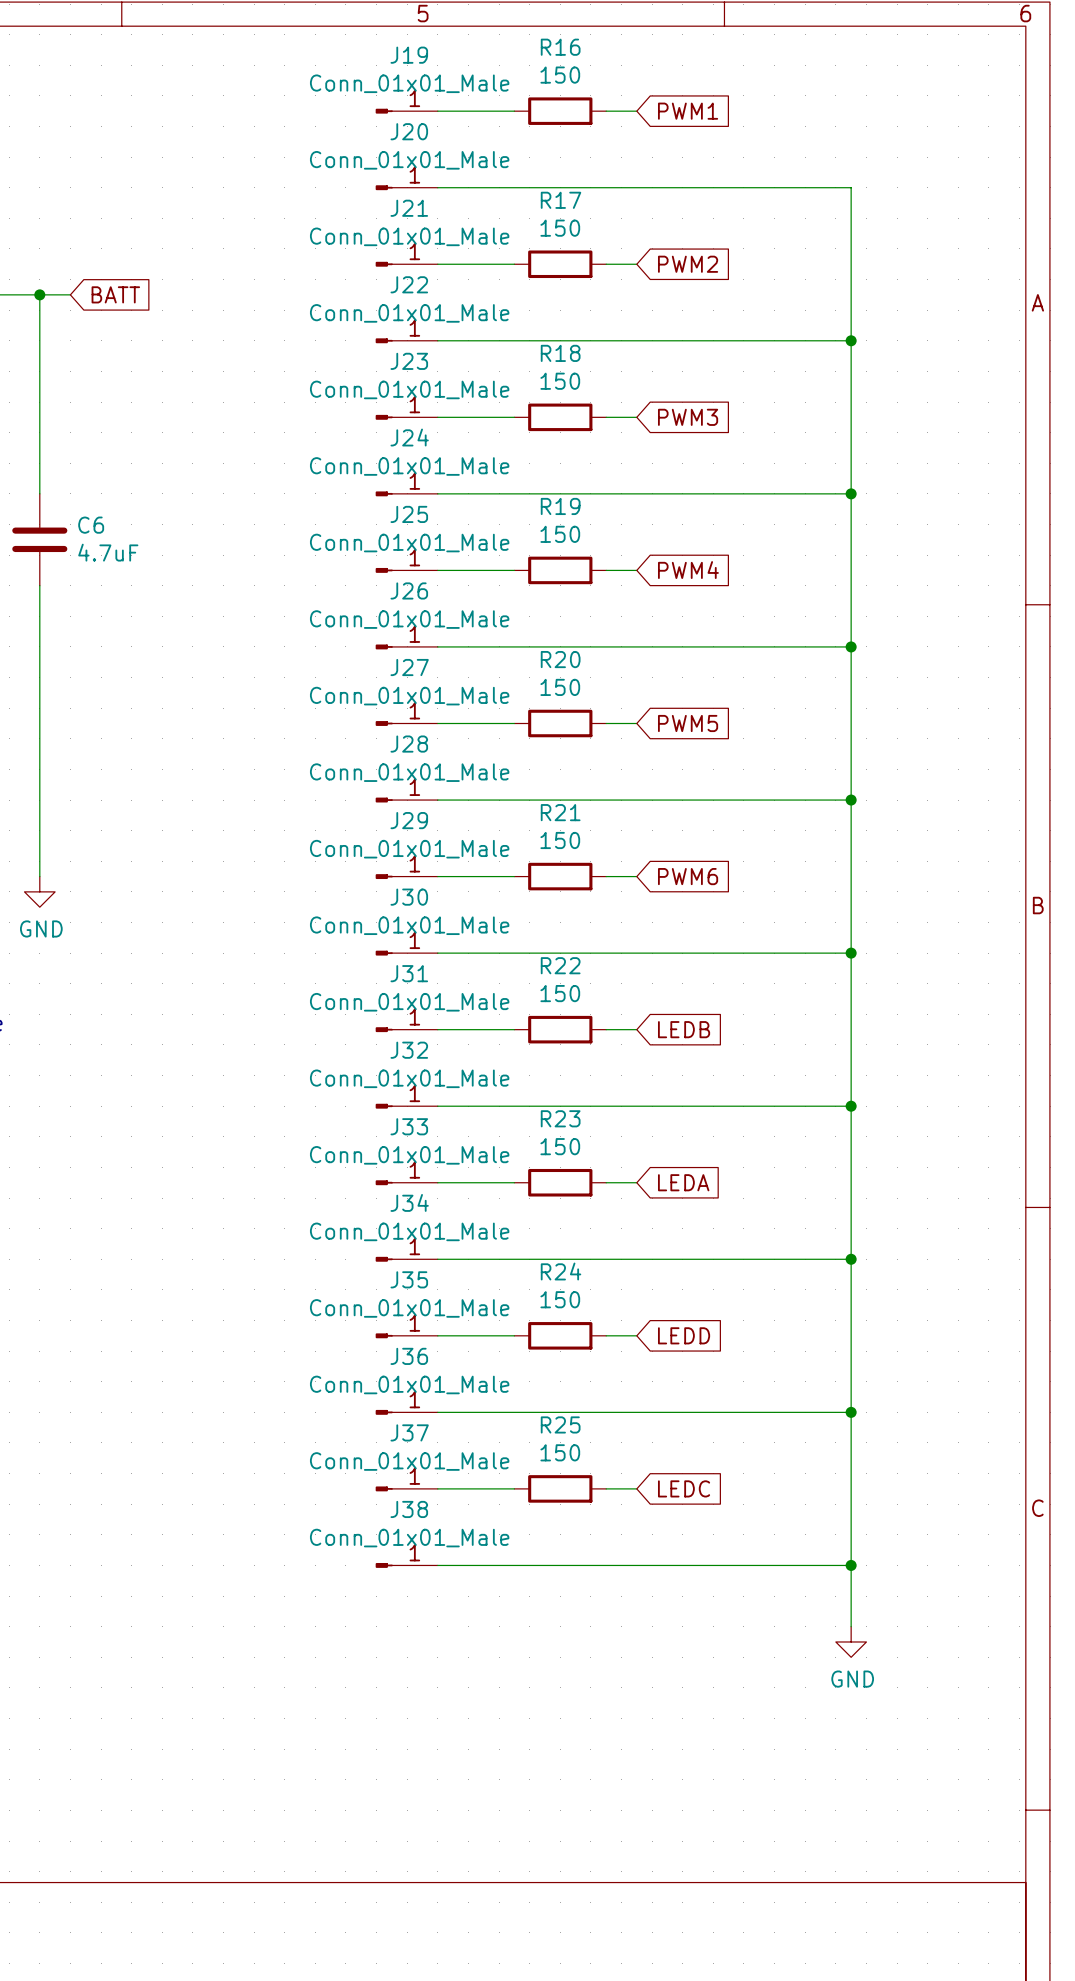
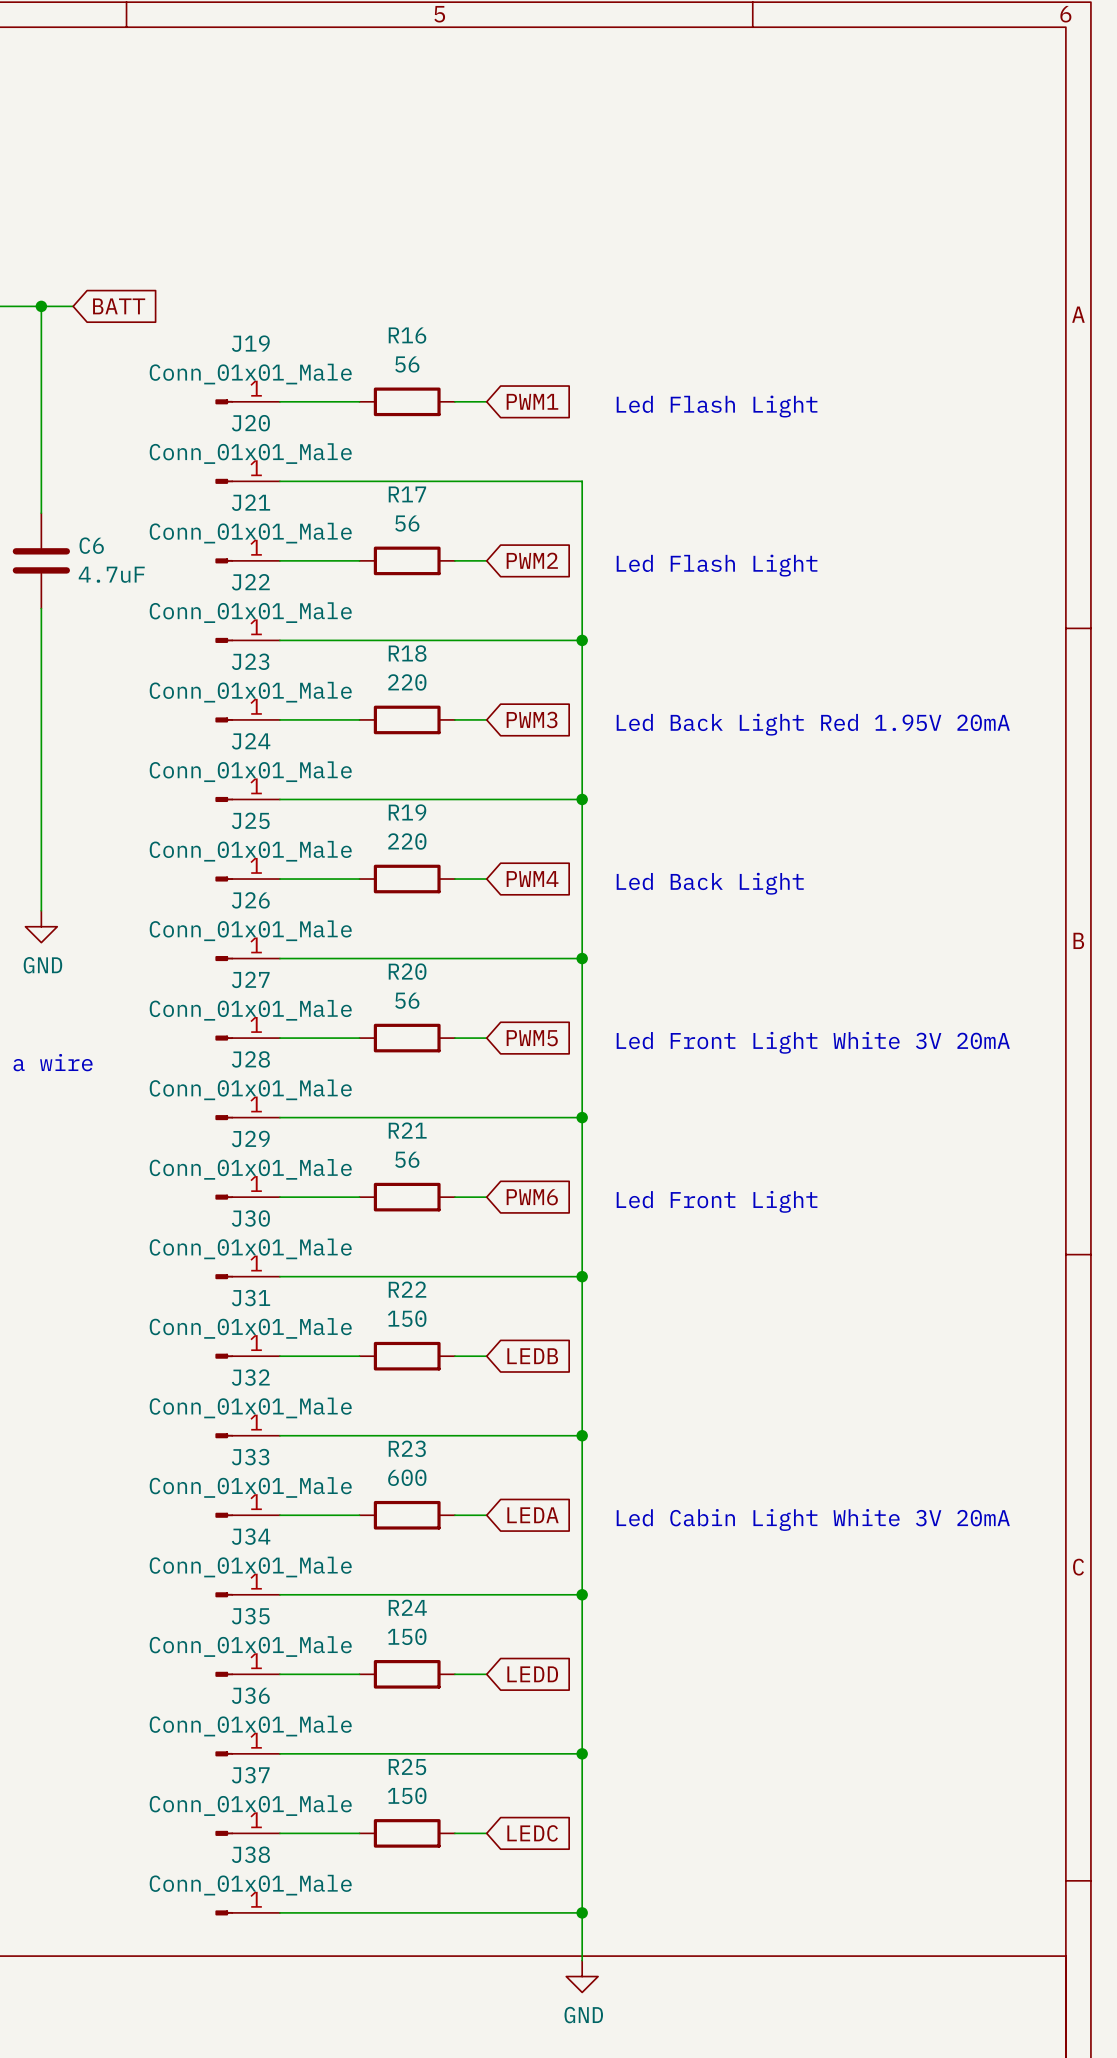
R16 value: 150 (560, 75) -> 56 (407, 364)
J19 position: (406, 111) -> (247, 401)
wire: (437, 111) (514, 111) -> none
R16 position: (560, 111) -> (407, 401)
wire: (606, 111) (636, 111) -> none
global label: PWM1 (688, 111) -> none
J20 position: (406, 187) -> (247, 481)
wire: (437, 187) (851, 187) (851, 1626) -> none
R17 value: 150 (560, 228) -> 56 (407, 523)
J21 position: (406, 264) -> (247, 560)
wire: (437, 264) (514, 264) -> (279, 401) (359, 401)
R17 position: (560, 264) -> (407, 560)
wire: (606, 264) (636, 264) -> (454, 401) (486, 401)
global label: PWM2 (688, 264) -> none
J22 position: (406, 340) -> (247, 640)
wire: (437, 340) (851, 340) -> none
junction: (851, 340) -> none
R18 value: 150 (560, 381) -> 220 (407, 682)
global label: none -> PWM1 (532, 401)
text: none -> Led Flash Light (717, 406)
J23 position: (406, 417) -> (247, 719)
wire: (437, 417) (514, 417) -> (279, 560) (359, 560)
R18 position: (560, 417) -> (407, 719)
wire: (606, 417) (636, 417) -> (454, 560) (486, 560)
global label: PWM3 (688, 417) -> none
wire: none -> (279, 481) (582, 481) (582, 1960)
J24 position: (406, 493) -> (247, 799)
wire: (437, 493) (851, 493) -> none
junction: (851, 493) -> none
R19 value: 150 (560, 534) -> 220 (407, 841)
global label: none -> PWM2 (532, 560)
text: none -> Led Flash Light (717, 565)
J25 position: (406, 570) -> (247, 879)
wire: (437, 570) (514, 570) -> (279, 719) (359, 719)
R19 position: (560, 570) -> (407, 879)
wire: (606, 570) (636, 570) -> (454, 719) (486, 719)
global label: PWM4 (688, 570) -> none
wire: none -> (279, 640) (582, 640)
junction: none -> (582, 640)
J26 position: (406, 646) -> (247, 958)
wire: (437, 646) (851, 646) -> none
junction: (851, 646) -> none
R20 value: 150 (560, 687) -> 56 (407, 1000)
global label: none -> PWM3 (532, 719)
text: none -> Led Back Light Red 1.95V 20mA (813, 724)
J27 position: (406, 723) -> (247, 1038)
wire: (437, 723) (514, 723) -> (279, 879) (359, 879)
R20 position: (560, 723) -> (407, 1038)
wire: (606, 723) (636, 723) -> (454, 879) (486, 879)
global label: PWM5 (688, 723) -> none
wire: none -> (279, 799) (582, 799)
junction: none -> (582, 799)
J28 position: (406, 800) -> (247, 1117)
wire: (437, 800) (851, 800) -> none
junction: (851, 800) -> none
R21 value: 150 (560, 840) -> 56 (407, 1159)
global label: none -> PWM4 (532, 879)
text: none -> Led Back Light (710, 883)
J29 position: (406, 876) -> (247, 1197)
wire: (437, 876) (514, 876) -> (279, 1038) (359, 1038)
R21 position: (560, 876) -> (407, 1197)
wire: (606, 876) (636, 876) -> (454, 1038) (486, 1038)
global label: PWM6 (688, 876) -> none
wire: none -> (279, 958) (582, 958)
junction: none -> (582, 958)
J30 position: (406, 953) -> (247, 1276)
wire: (437, 953) (851, 953) -> none
junction: (851, 953) -> none
global label: none -> PWM5 (532, 1038)
text: none -> Led Front Light White 3V 20mA (813, 1042)
J31 position: (406, 1029) -> (247, 1356)
wire: (437, 1029) (514, 1029) -> (279, 1197) (359, 1197)
R22 position: (560, 1029) -> (407, 1356)
wire: (606, 1029) (636, 1029) -> (454, 1197) (486, 1197)
global label: LEDB (684, 1029) -> none
wire: none -> (279, 1117) (582, 1117)
junction: none -> (582, 1117)
J32 position: (406, 1106) -> (247, 1435)
wire: (437, 1106) (851, 1106) -> none
junction: (851, 1106) -> none
R23 value: 150 (560, 1146) -> 600 (407, 1477)
global label: none -> PWM6 (532, 1197)
text: none -> Led Front Light (717, 1201)
J33 position: (406, 1182) -> (247, 1515)
wire: (437, 1182) (514, 1182) -> (279, 1356) (359, 1356)
R23 position: (560, 1182) -> (407, 1515)
wire: (606, 1182) (636, 1182) -> (454, 1356) (486, 1356)
global label: LEDA (683, 1182) -> none
wire: none -> (279, 1276) (582, 1276)
junction: none -> (582, 1276)
J34 position: (406, 1259) -> (247, 1594)
wire: (437, 1259) (851, 1259) -> none
junction: (851, 1259) -> none
global label: none -> LEDB (532, 1356)
J35 position: (406, 1335) -> (247, 1674)
wire: (437, 1335) (514, 1335) -> (279, 1515) (359, 1515)
R24 position: (560, 1335) -> (407, 1674)
wire: (606, 1335) (636, 1335) -> (454, 1515) (486, 1515)
global label: LEDD (684, 1335) -> none
wire: none -> (279, 1435) (582, 1435)
junction: none -> (582, 1435)
J36 position: (406, 1412) -> (247, 1753)
wire: (437, 1412) (851, 1412) -> none
junction: (851, 1412) -> none
global label: none -> LEDA (533, 1515)
text: none -> Led Cabin Light White 3V 20mA (813, 1519)
J37 position: (406, 1488) -> (247, 1833)
wire: (437, 1488) (514, 1488) -> (279, 1674) (359, 1674)
R25 position: (560, 1488) -> (407, 1833)
wire: (606, 1488) (636, 1488) -> (454, 1674) (486, 1674)
global label: LEDC (684, 1488) -> none
wire: none -> (279, 1594) (582, 1594)
junction: none -> (582, 1594)
J38 position: (406, 1565) -> (247, 1912)
wire: (437, 1565) (851, 1565) -> none
junction: (851, 1565) -> none
global label: none -> LEDD (532, 1674)
power symbol: GND (851, 1641) -> none
wire: none -> (279, 1753) (582, 1753)
junction: none -> (582, 1753)
wire: none -> (279, 1833) (359, 1833)
wire: none -> (454, 1833) (486, 1833)
global label: none -> LEDC (532, 1833)
wire: none -> (279, 1912) (582, 1912)
junction: none -> (582, 1912)
power symbol: none -> GND (582, 1976)

